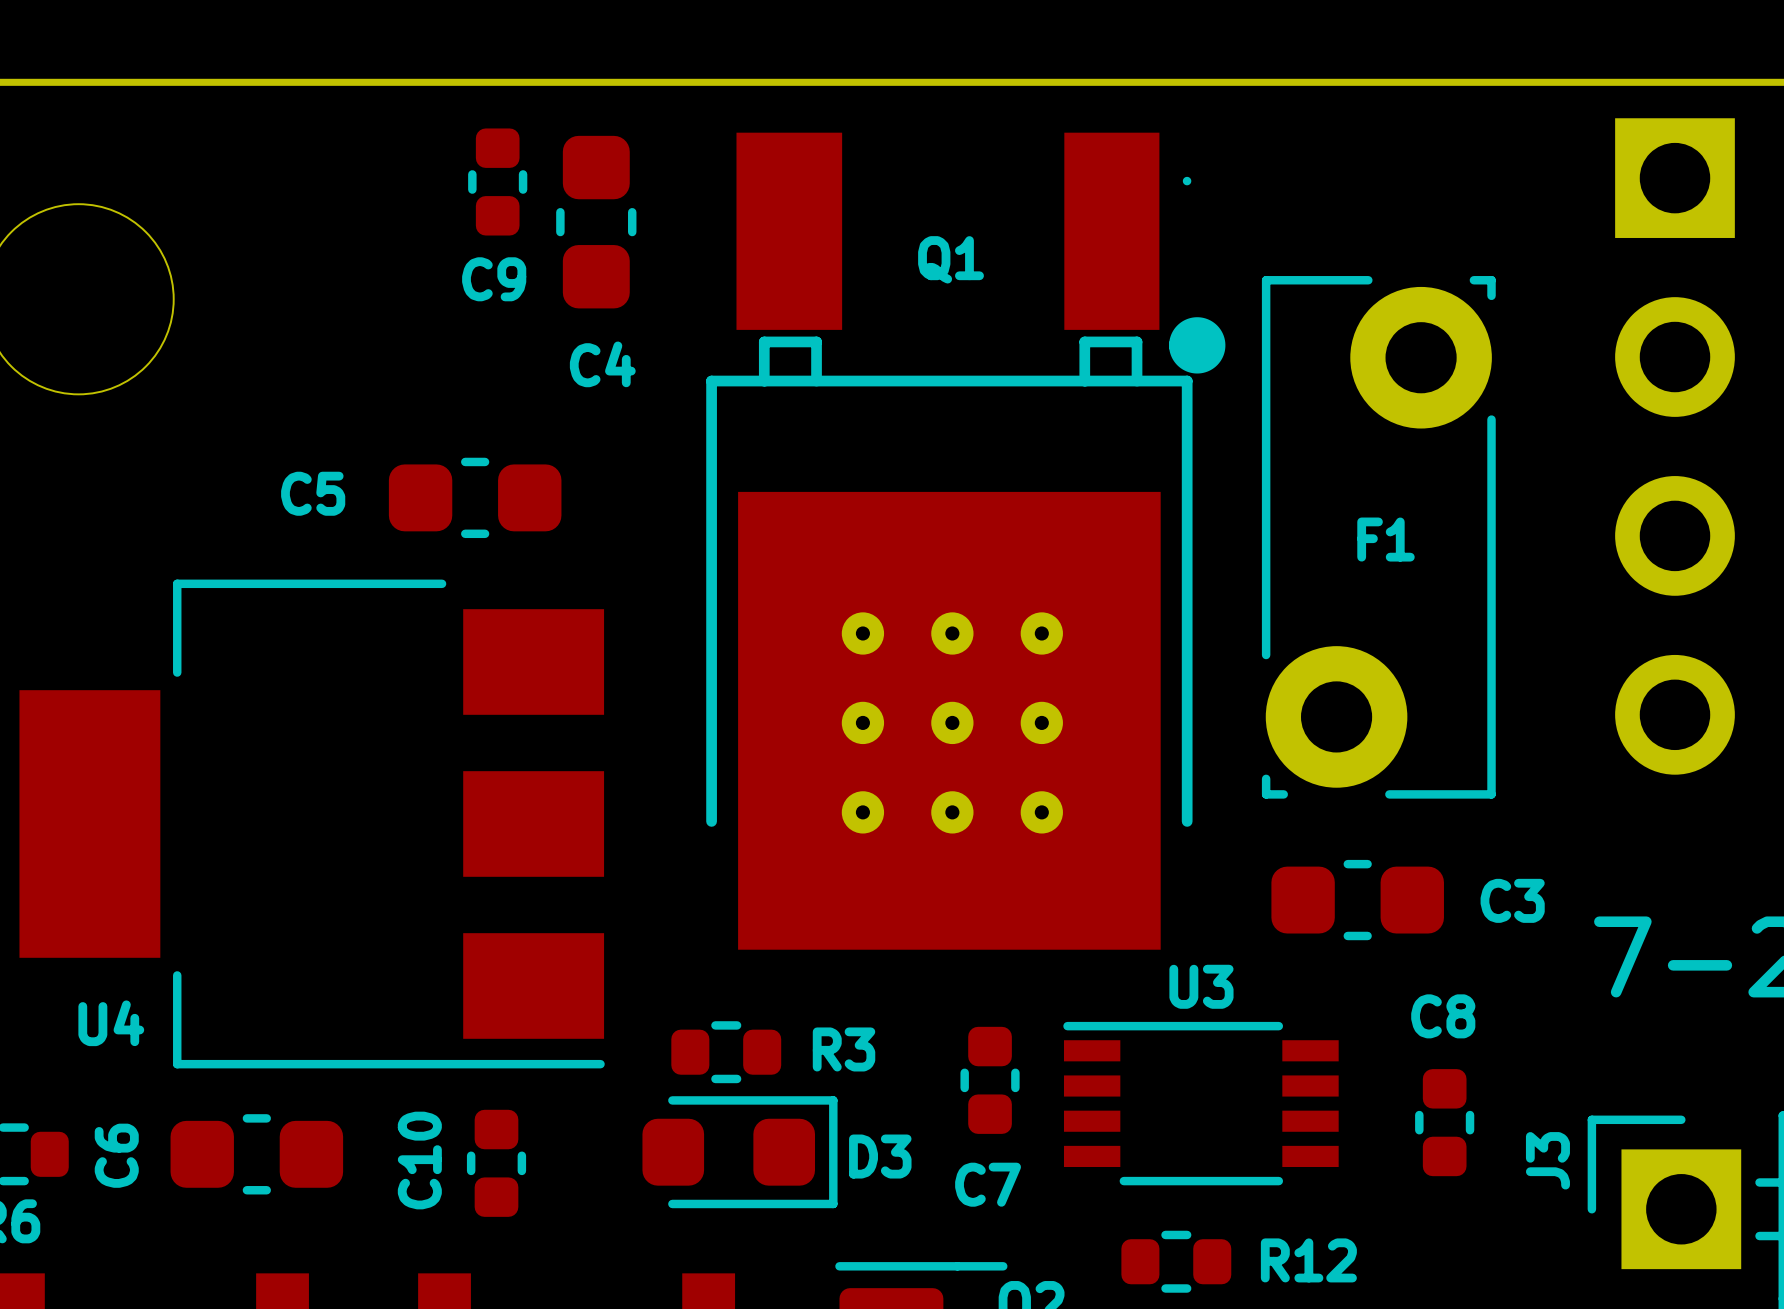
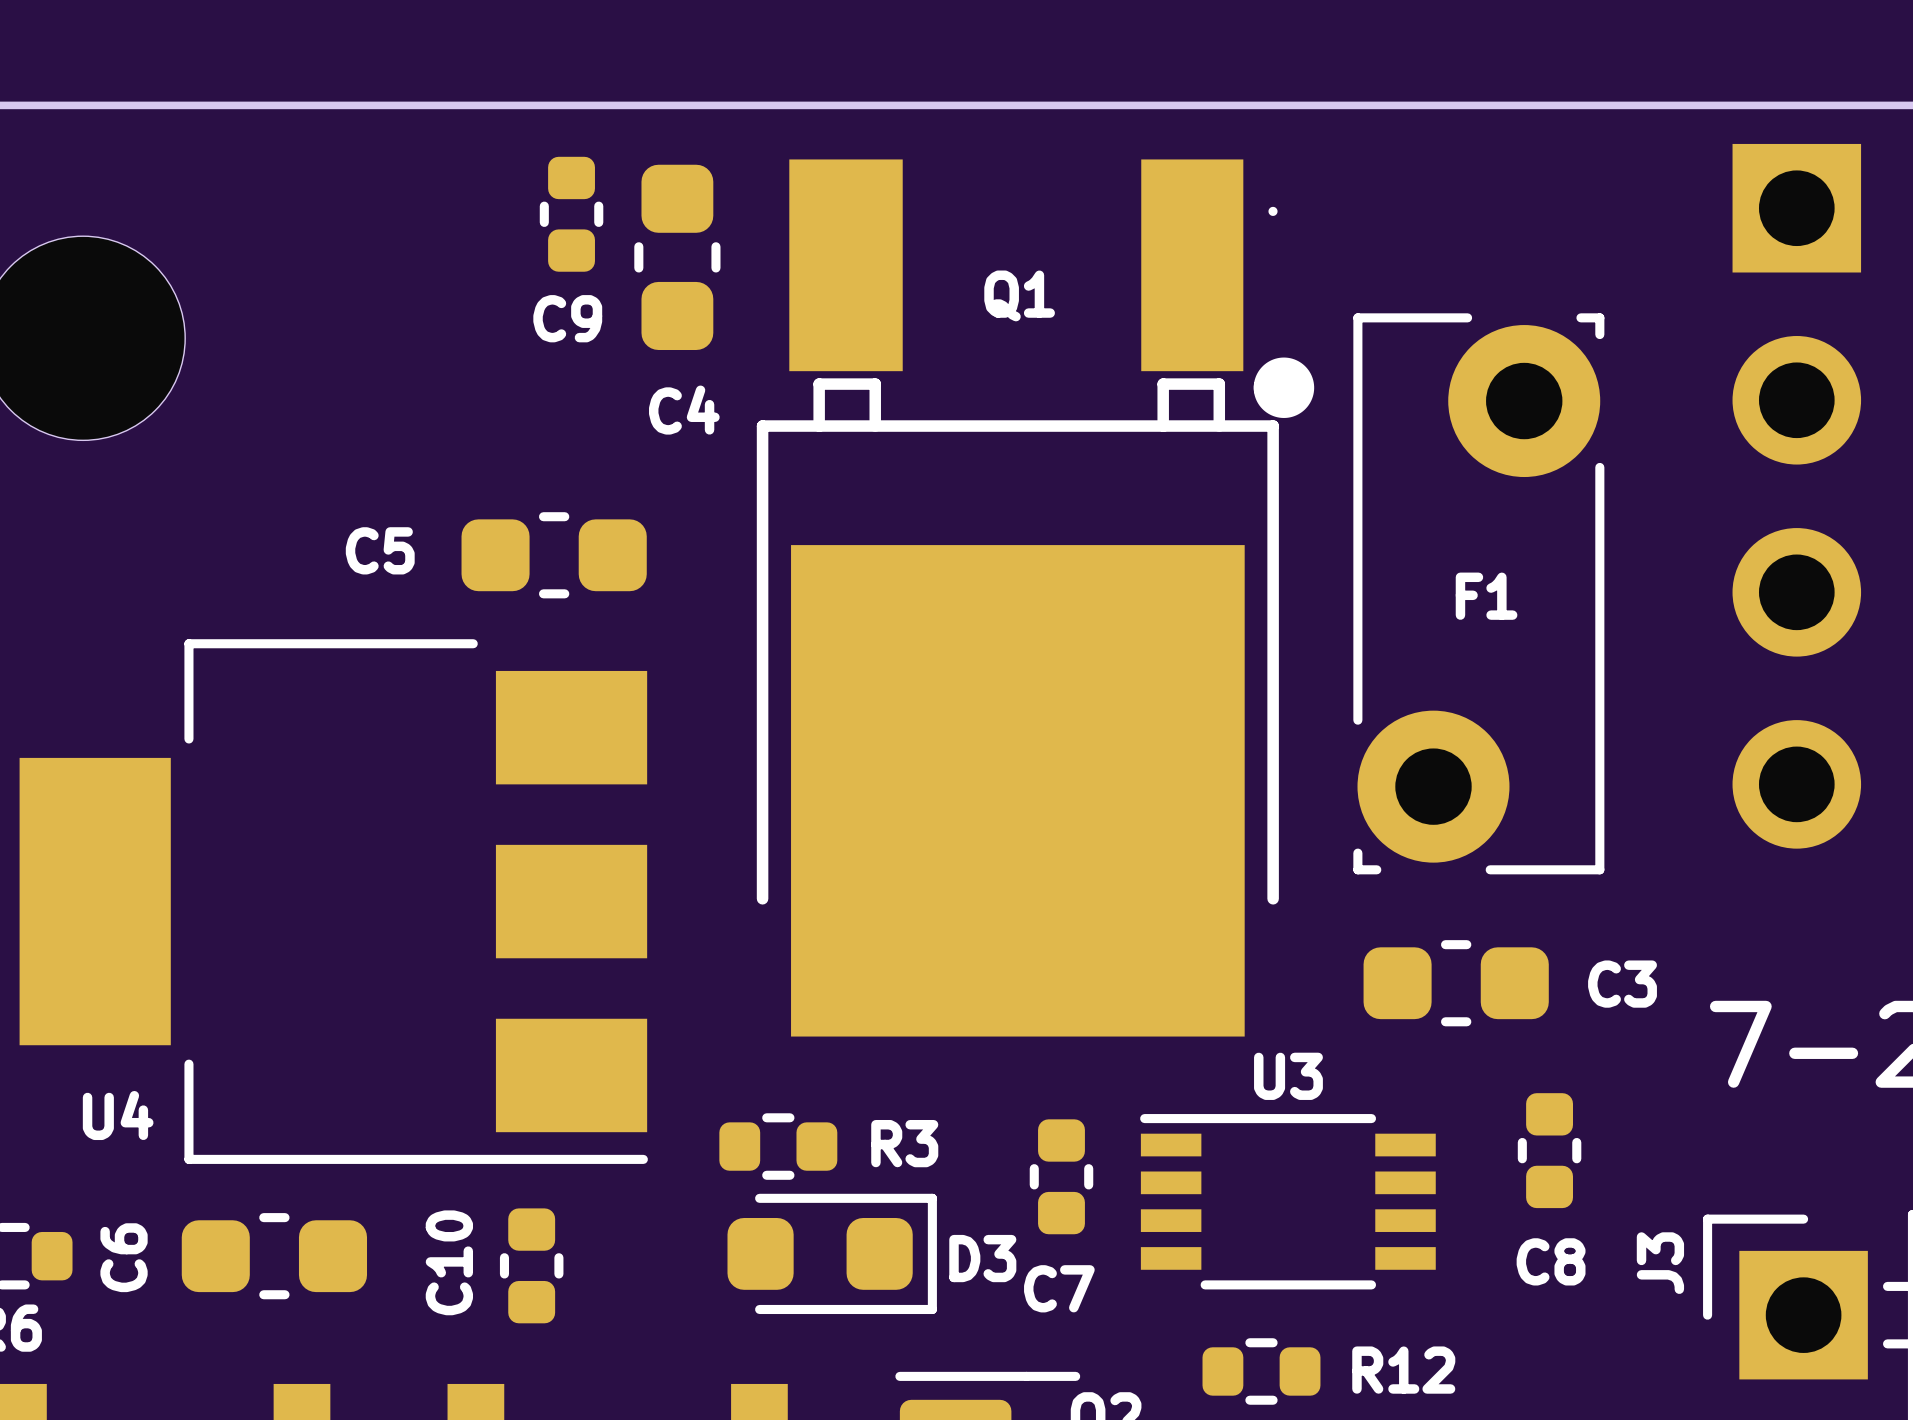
Q1 footprint: [706, 132, 1226, 950] -> [756, 159, 1315, 1037]
C9 position: (497, 181) -> (571, 214)
C4 position: (596, 222) -> (677, 257)
C5 position: (475, 497) -> (554, 555)
C8 name position: C8 (1443, 1016) -> C8 (1551, 1261)
C8 position: (1444, 1122) -> (1549, 1150)
D3 position: (739, 1152) -> (832, 1253)

